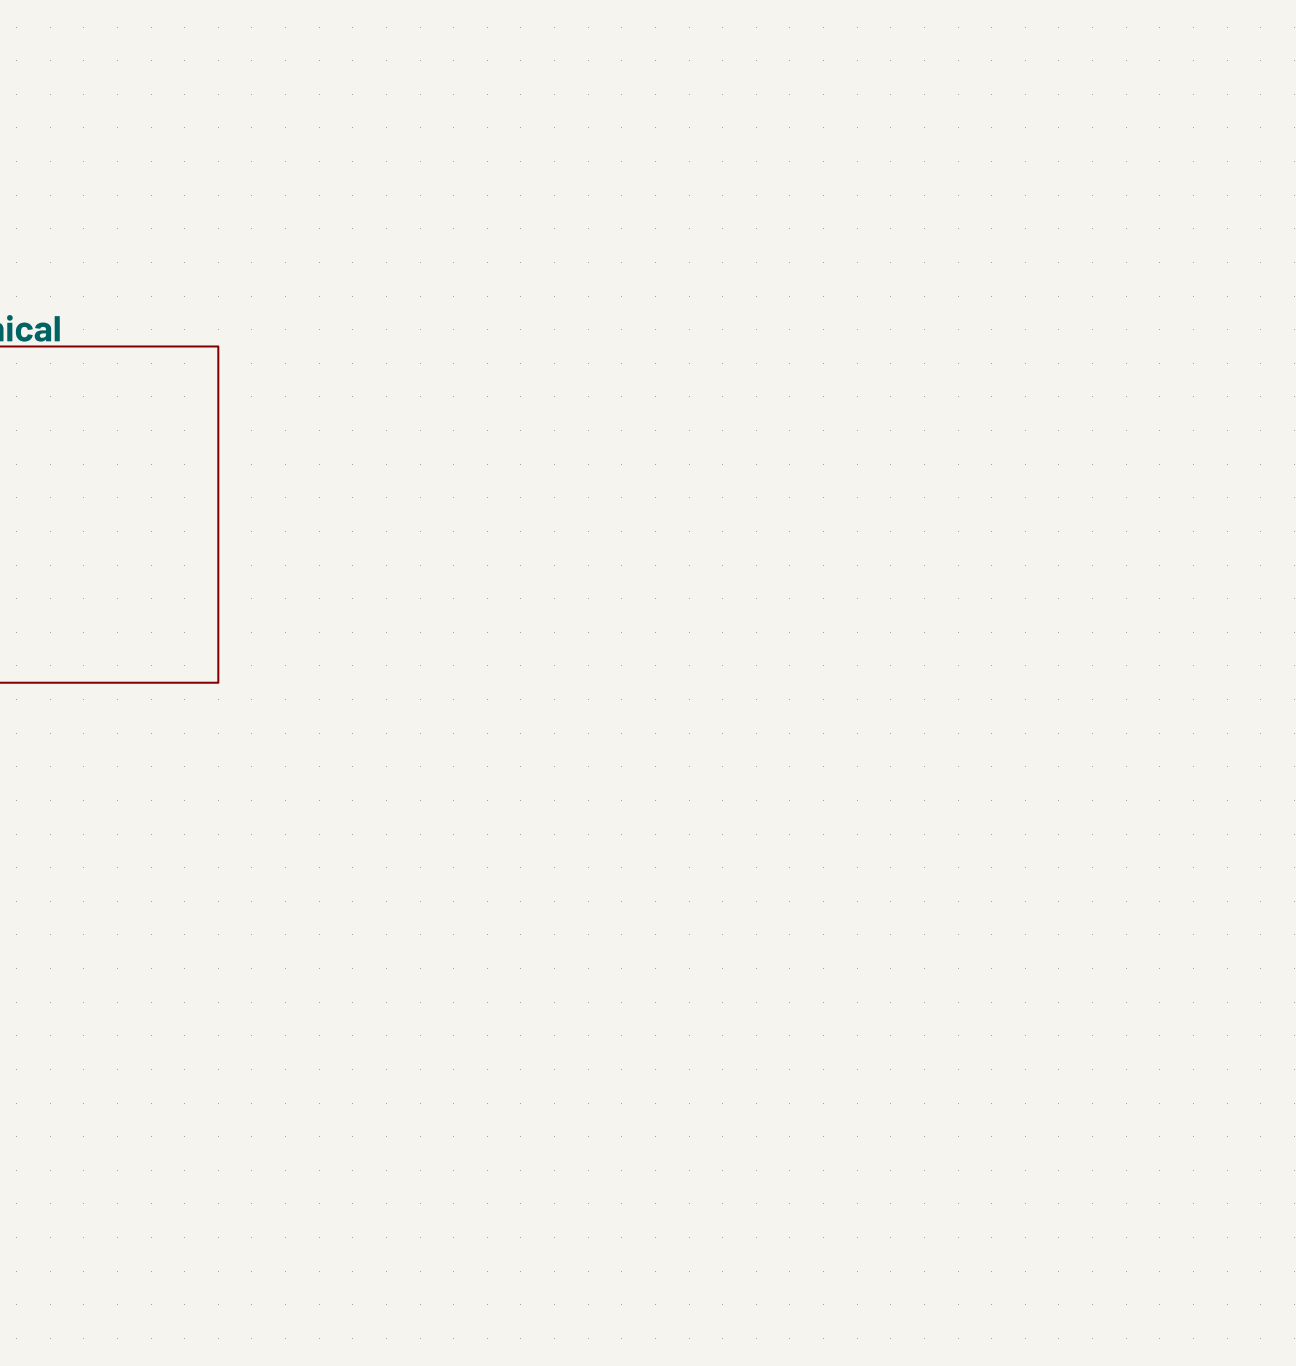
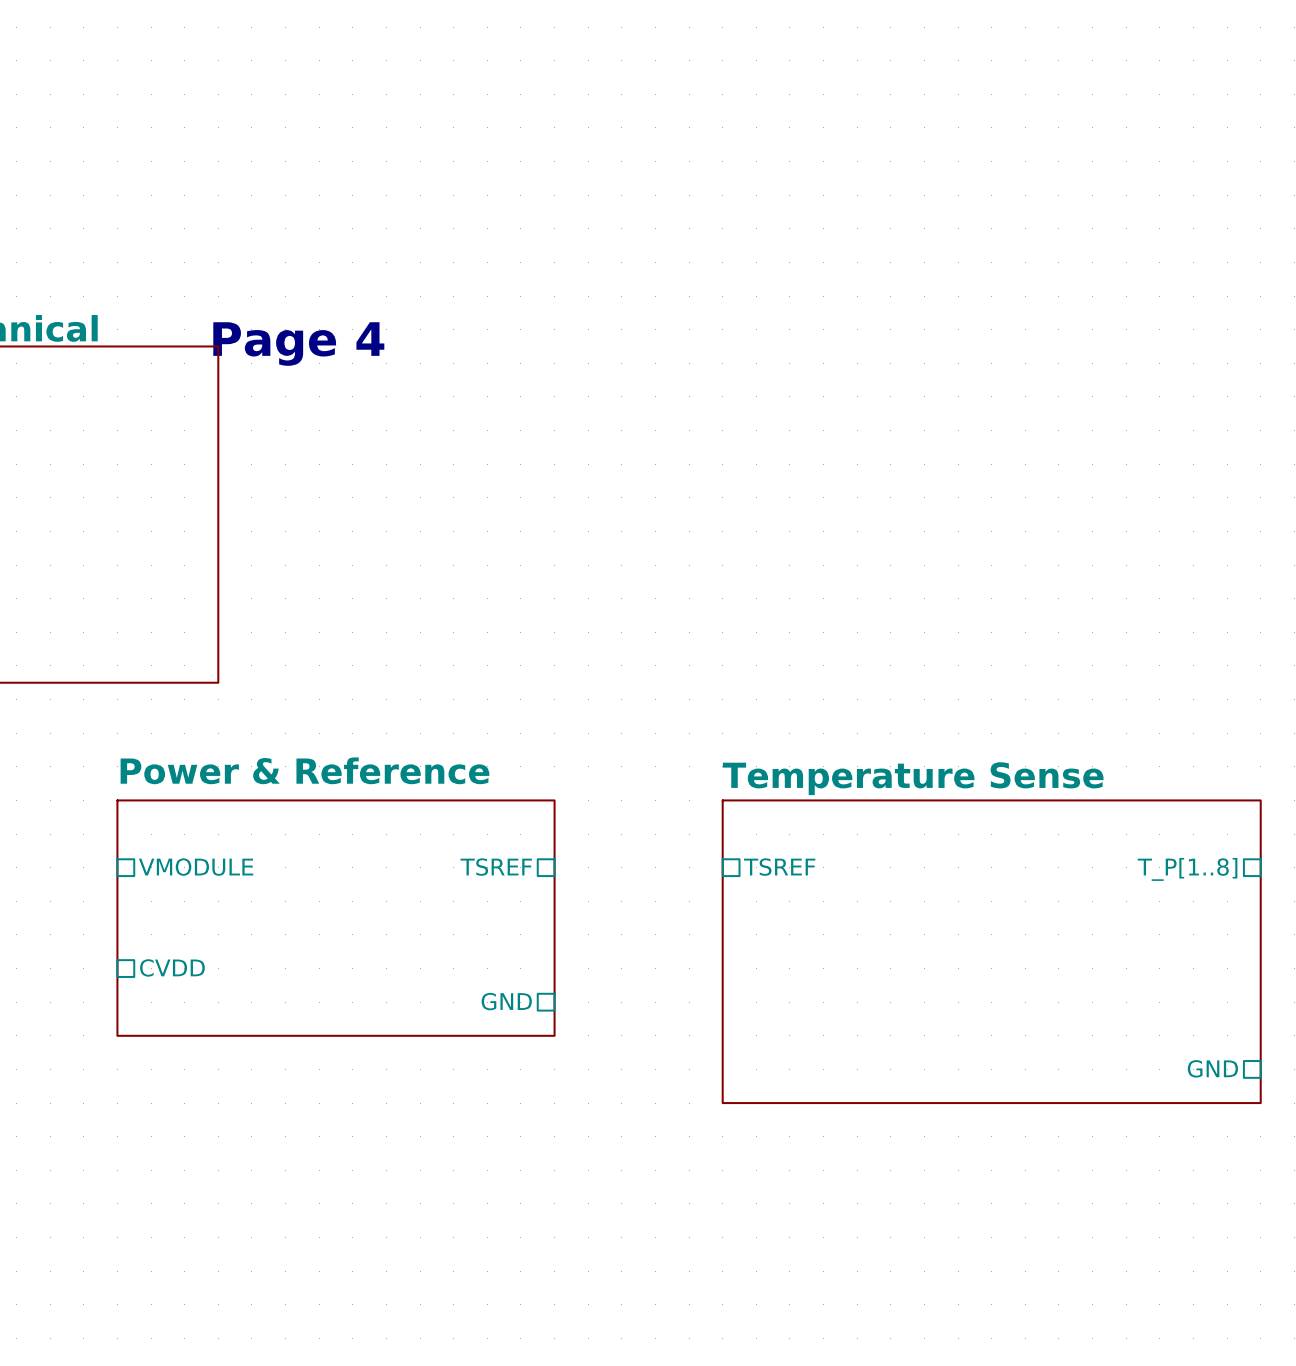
text: none -> Page 4 (298, 344)
sheet pin: none -> VMODULE (196, 867)
sheet pin: none -> TSREF (496, 867)
sheet pin: none -> TSREF (779, 867)
sheet pin: none -> T_P[1..8] (1187, 869)
sheet Power & Reference: none -> (336, 918)
sheet Temperature Sense: none -> (991, 951)
sheet pin: none -> CVDD (172, 967)
sheet pin: none -> GND (506, 1001)
sheet pin: none -> GND (1212, 1068)

